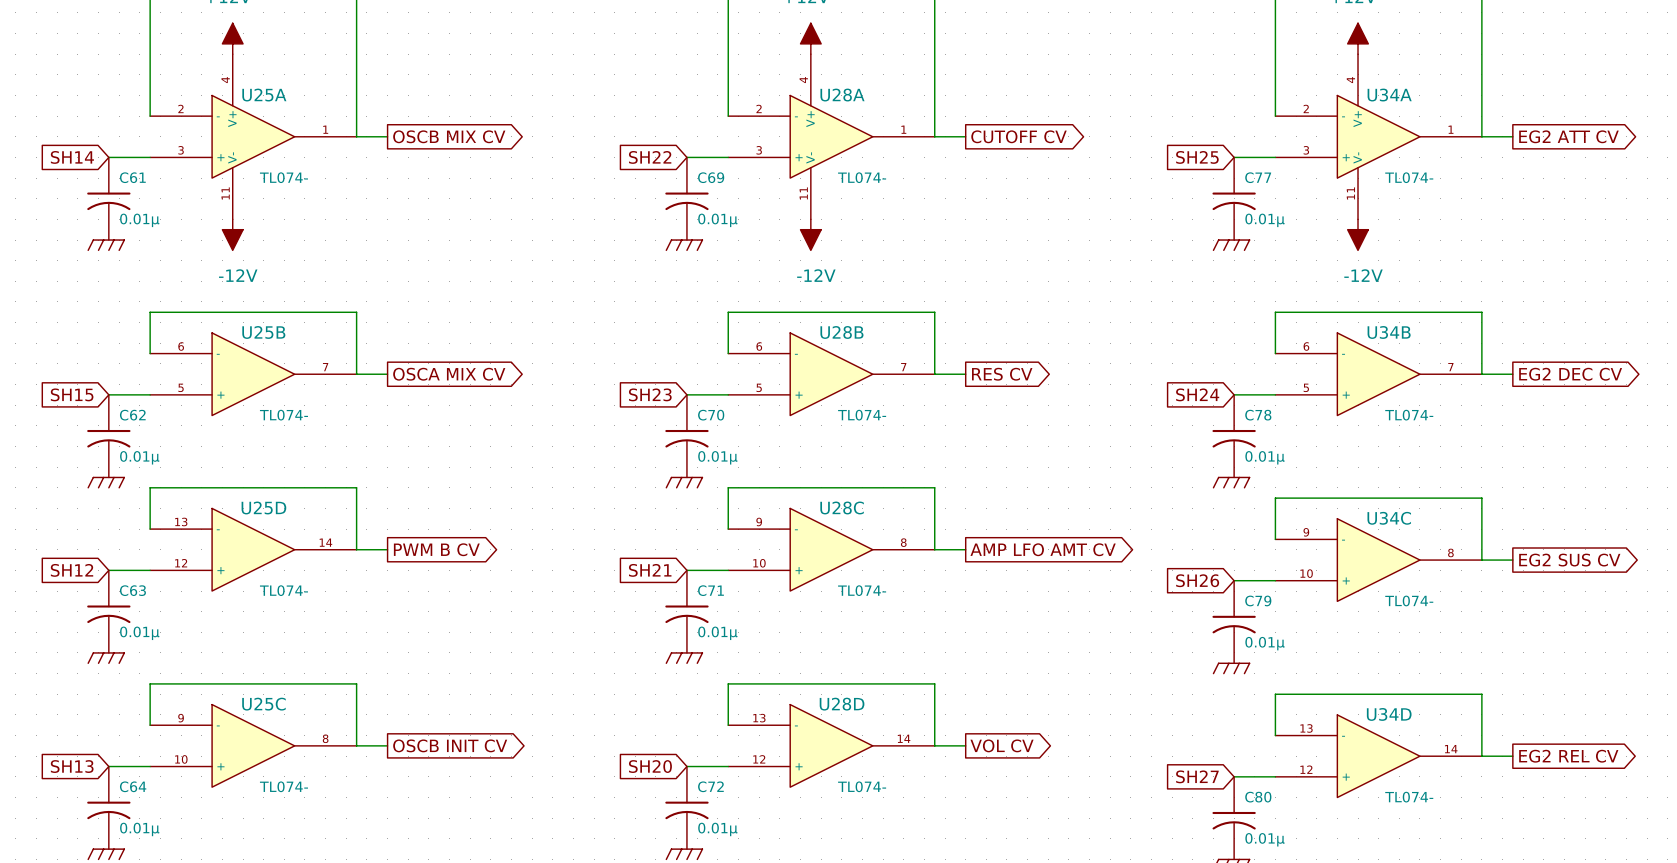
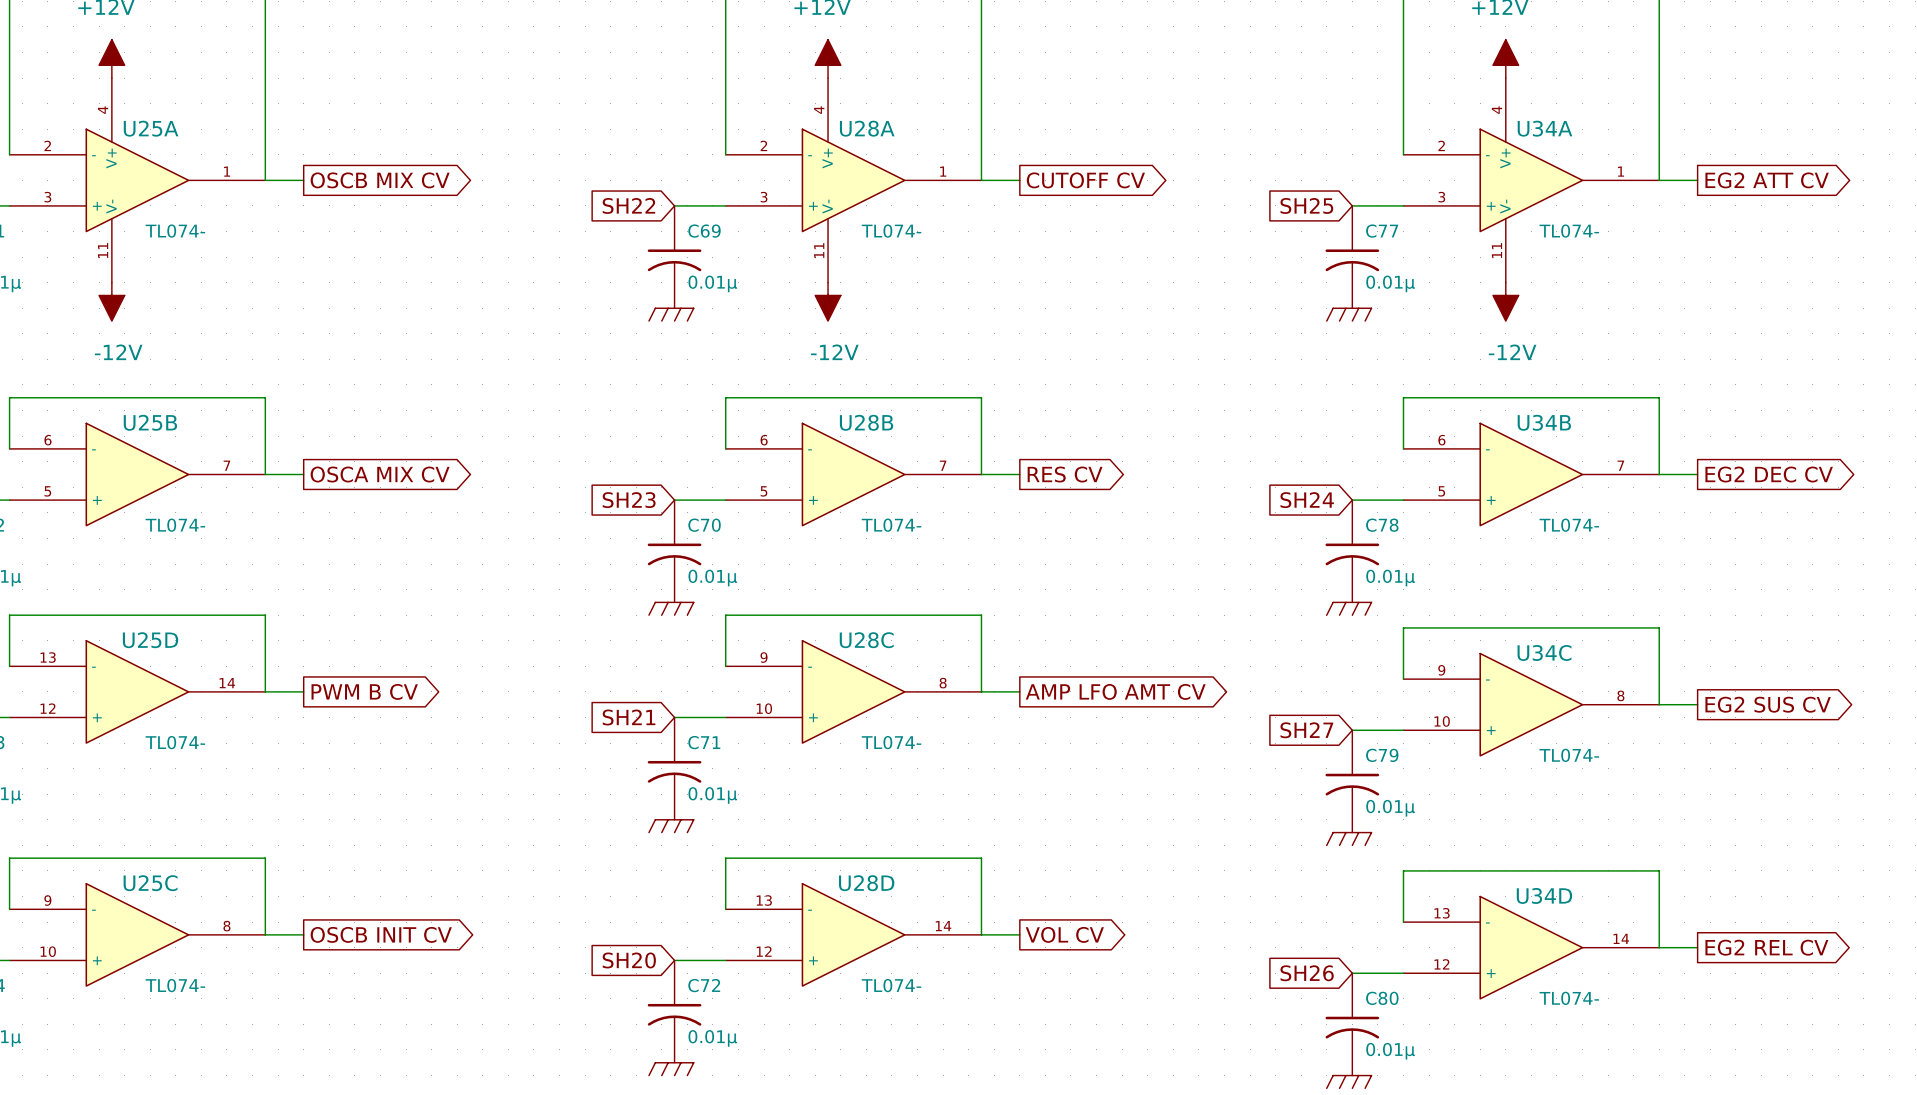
global label: SH26 (1197, 580) -> SH27 (1306, 730)
global label: SH27 (1197, 776) -> SH26 (1307, 973)

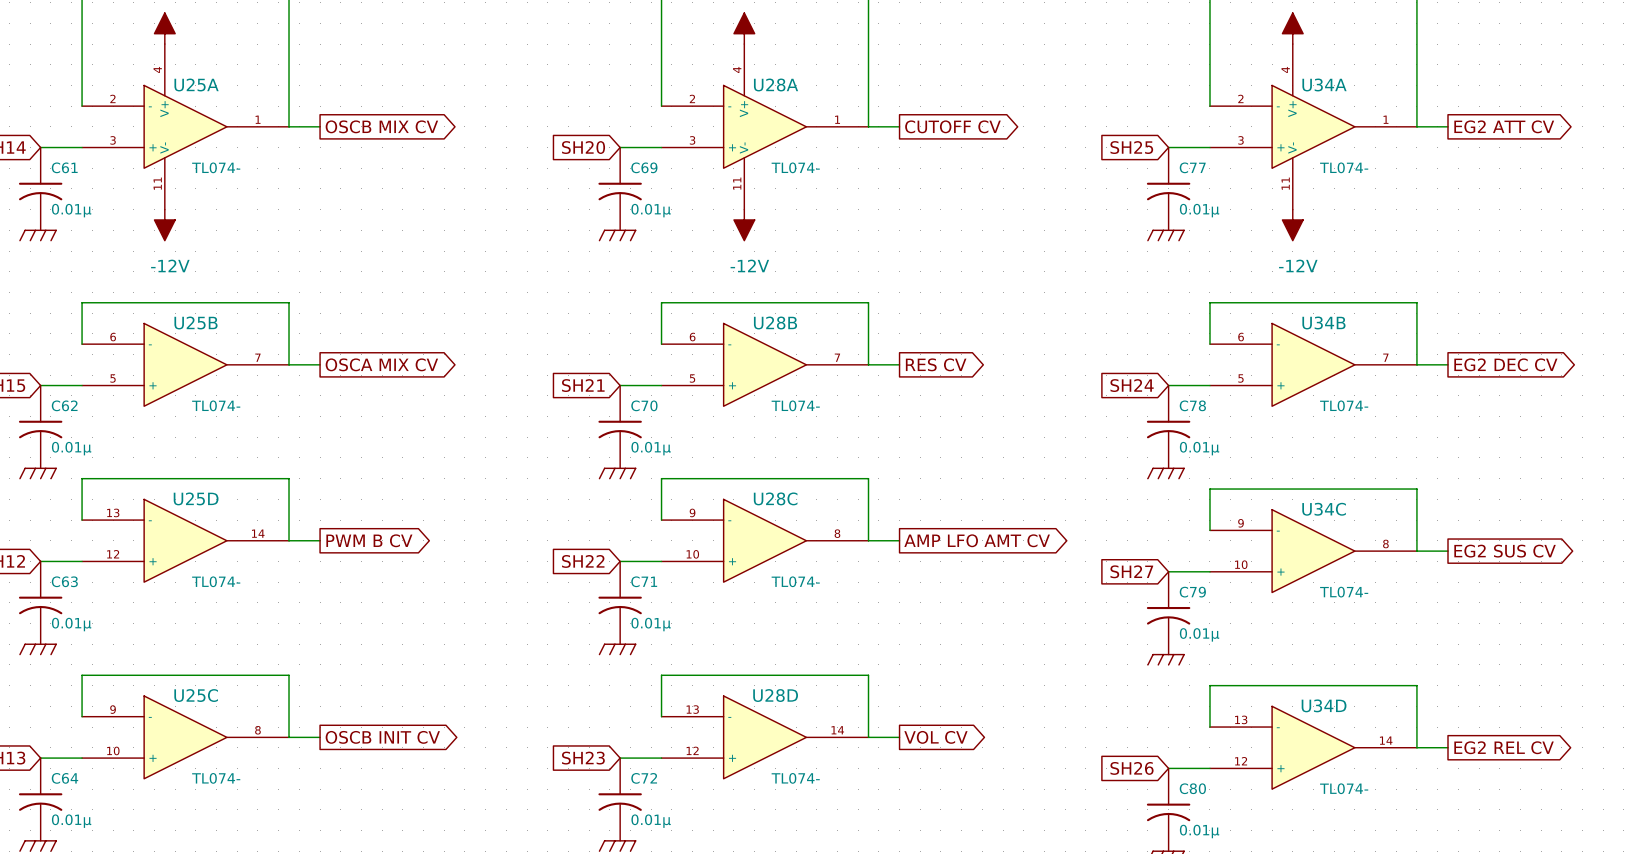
global label: SH22 (628, 205) -> SH20 (583, 147)
global label: SH23 (629, 500) -> SH21 (583, 385)
global label: SH21 (629, 717) -> SH22 (583, 561)
global label: SH20 (629, 960) -> SH23 (583, 758)

